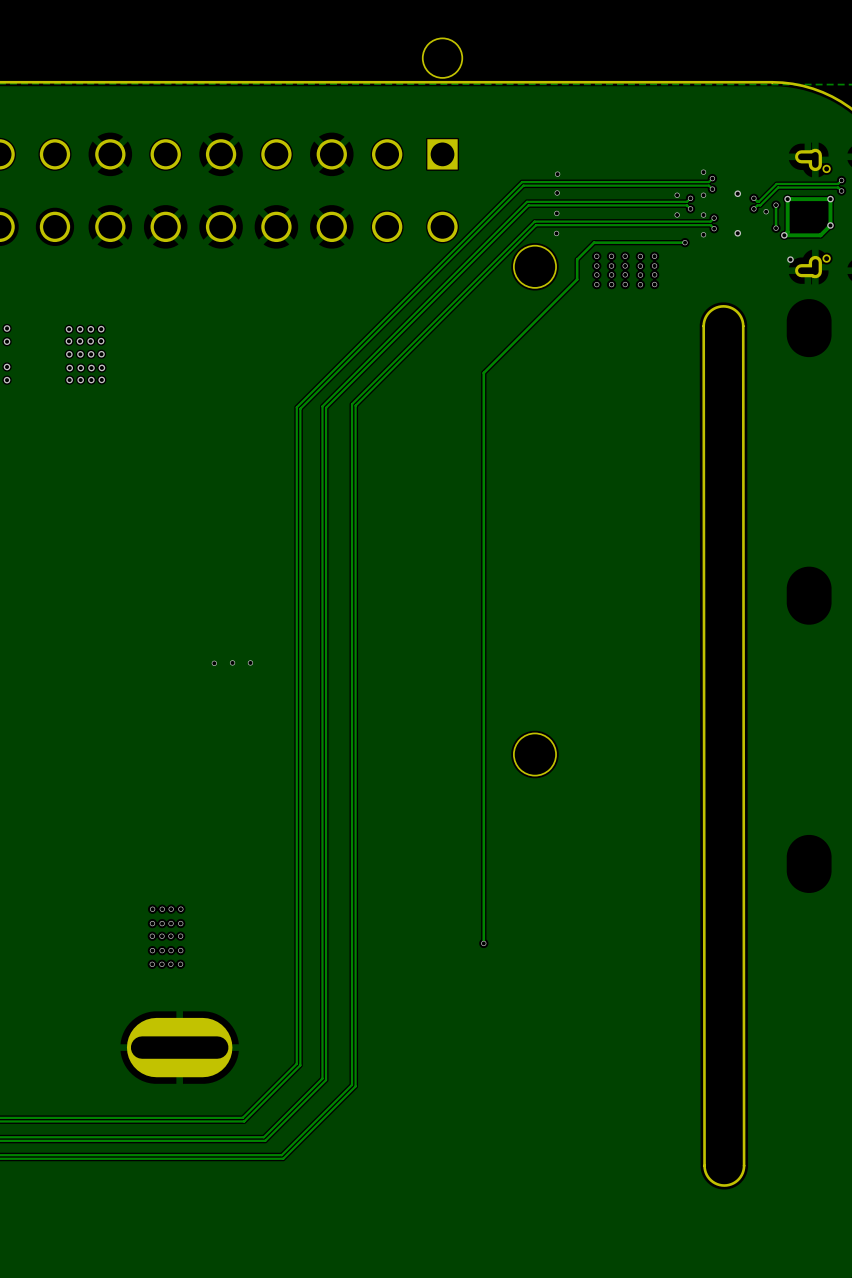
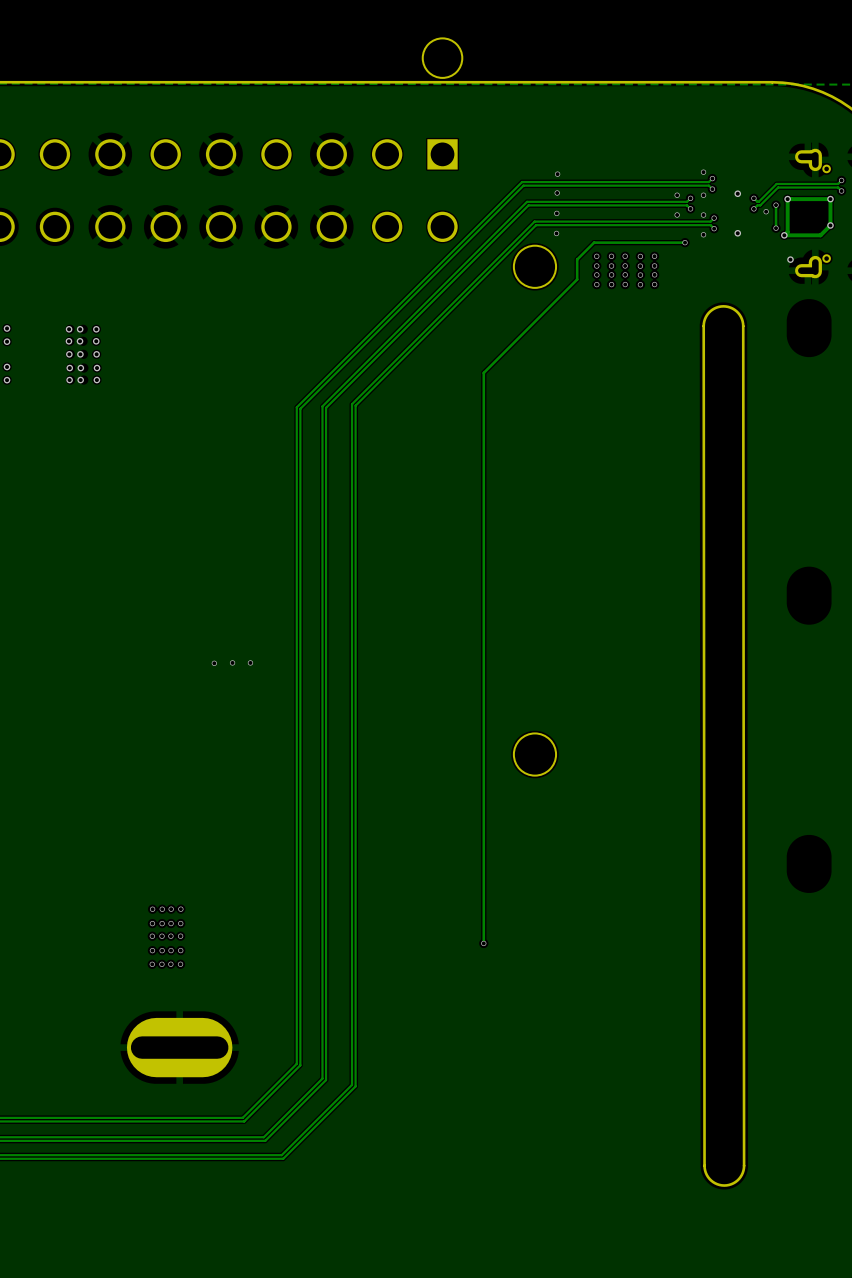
via: (90, 329) -> none
via: none -> (96, 329)
via: (101, 329) -> none
via: (90, 341) -> none
via: none -> (96, 341)
via: (101, 341) -> none
via: (91, 354) -> none
via: none -> (96, 354)
via: (101, 354) -> none
via: (101, 367) -> none
via: (91, 368) -> none
via: none -> (97, 368)
via: (101, 379) -> none
via: (91, 380) -> none
via: none -> (96, 380)

